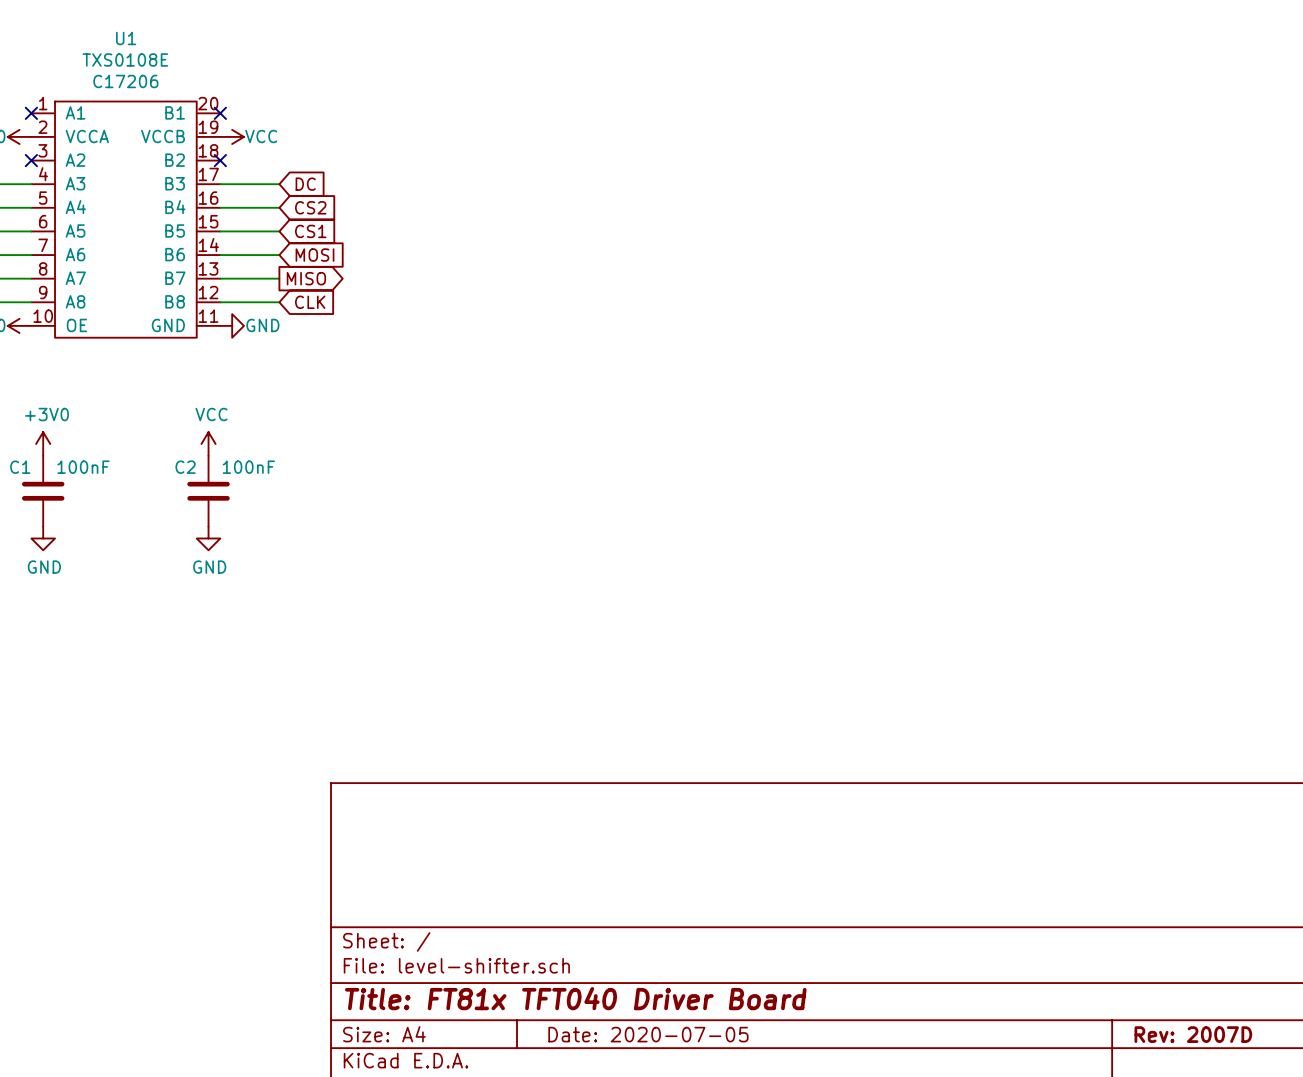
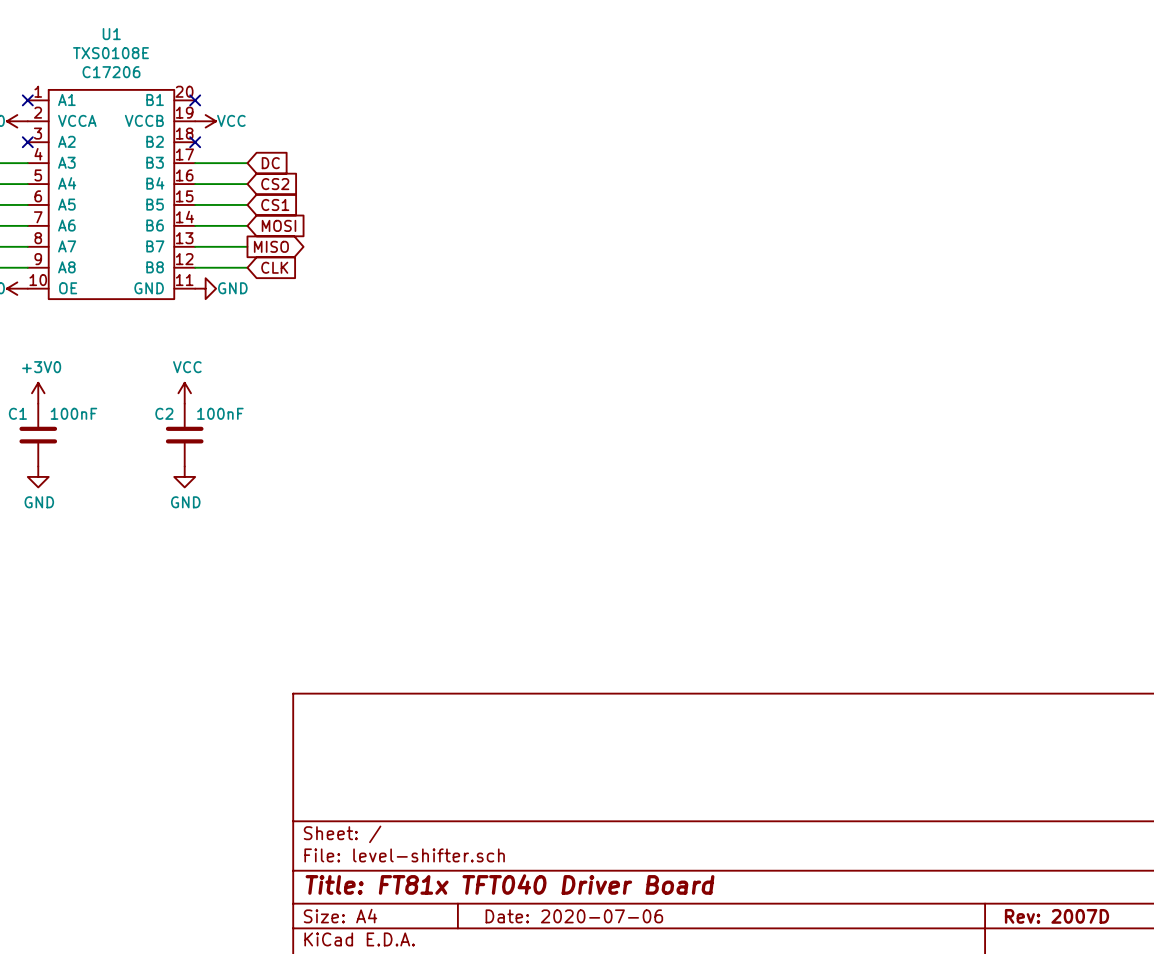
title block: Date: 2020-07-05 (648, 1034) -> Date: 2020-07-06 (574, 916)

